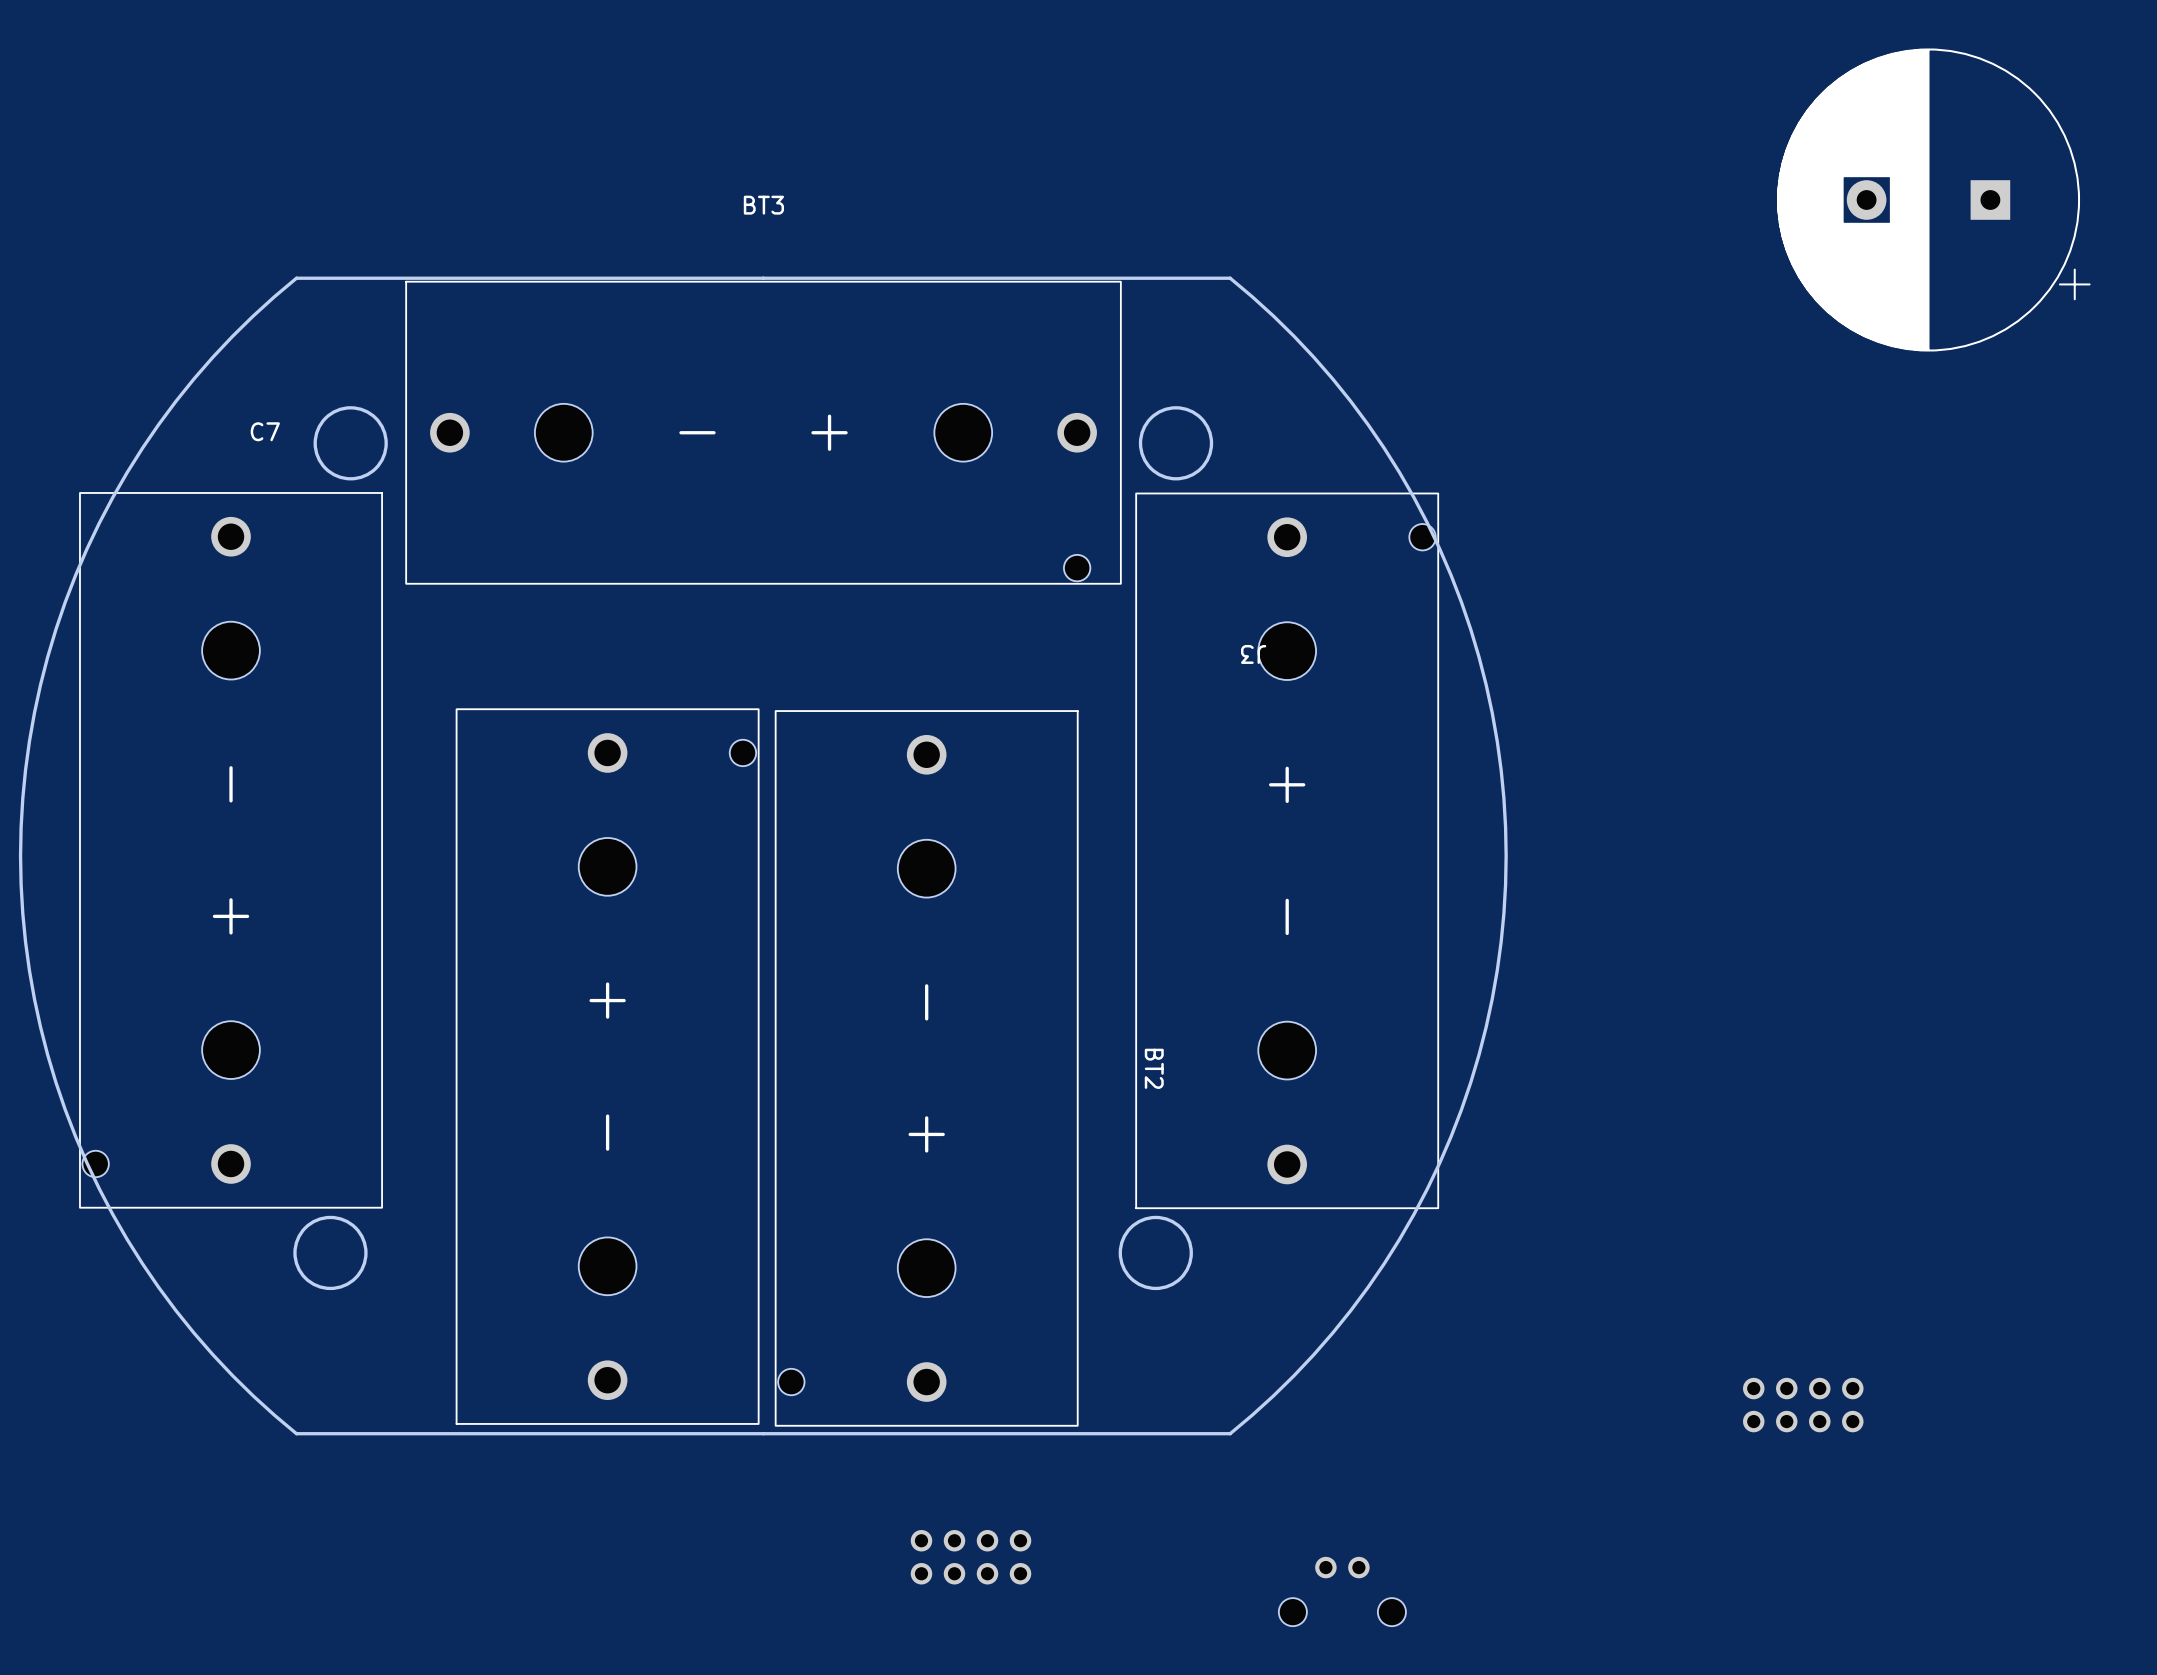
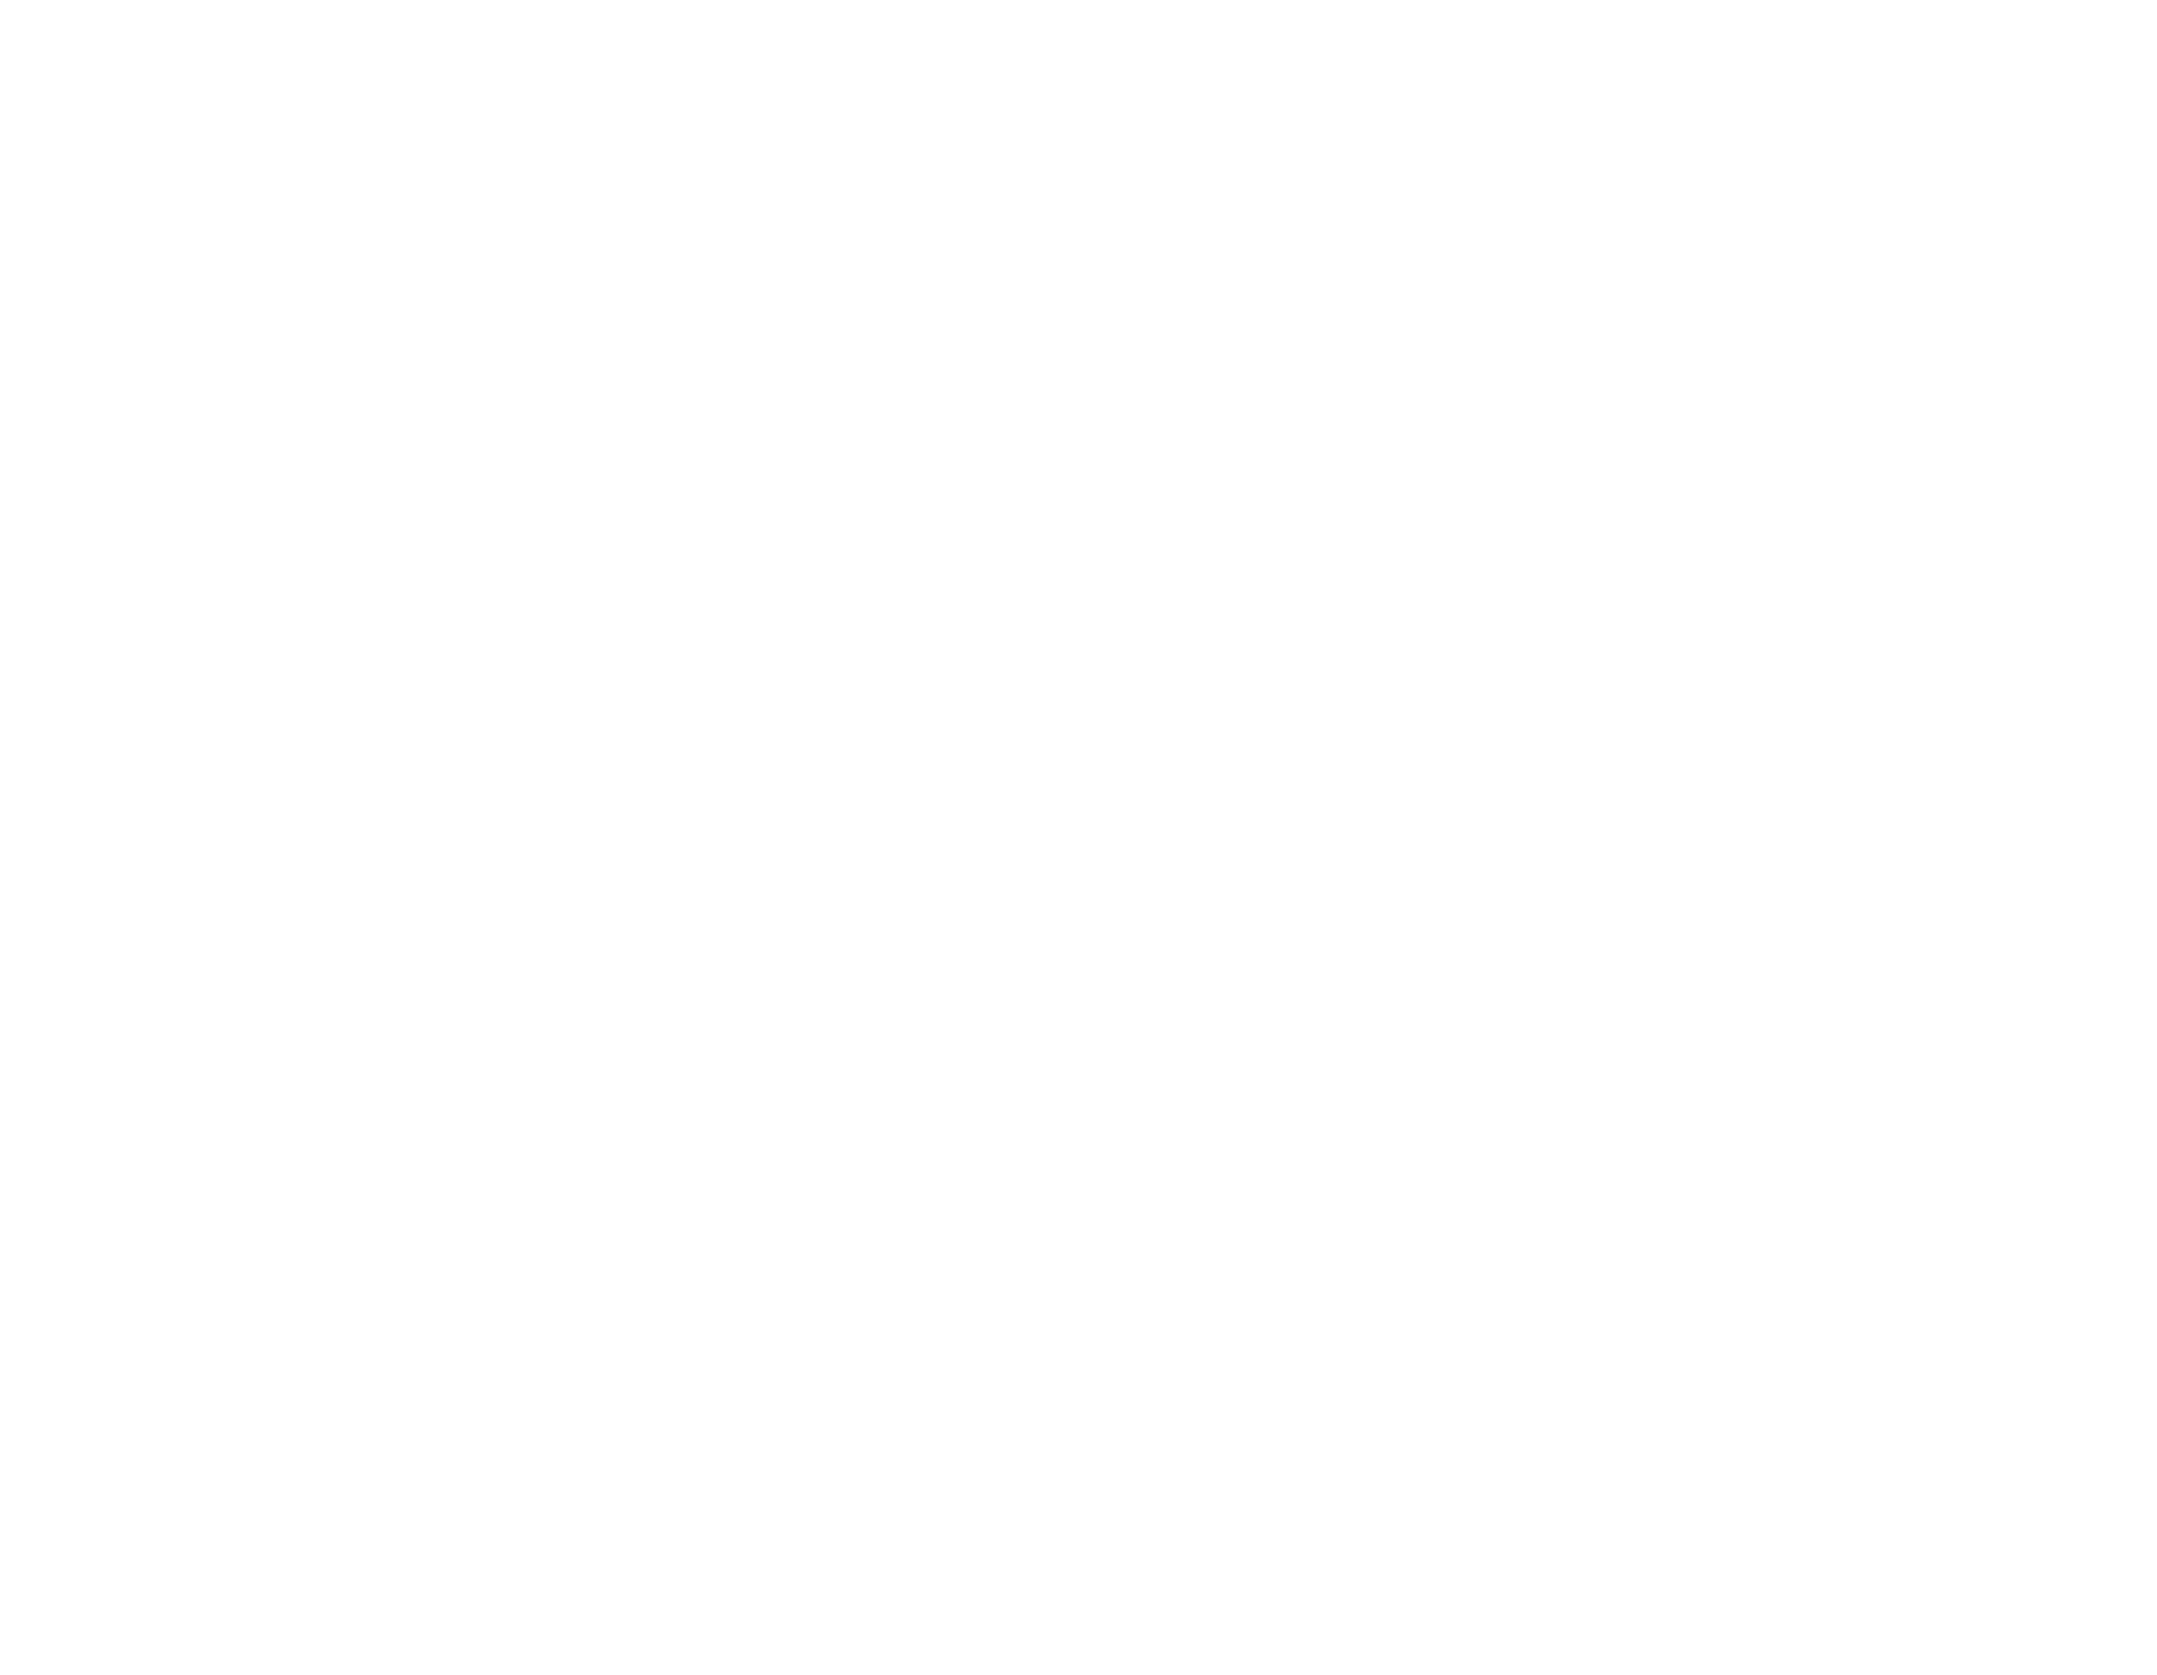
C7: (1933, 199) -> none
board edge: (1230, 278) (296, 278) (232, 336) (193, 378) (142, 448) (112, 497) (75, 575) (55, 629) (40, 684) (25, 769) (20, 855) (22, 913) (34, 998) (55, 1082) (75, 1136) (112, 1214) (142, 1263) (193, 1333) (253, 1395) (296, 1433) (1230, 1433) (1273, 1395) (1332, 1333) (1367, 1287) (1413, 1214) (1439, 1163) (1470, 1082) (1486, 1027) (1501, 942) (1506, 855) (1501, 769) (1486, 684) (1470, 629) (1439, 548) (1413, 497) (1367, 424) (1332, 378) (1294, 336) (1230, 278) -> none
round board edge: [313, 406, 388, 481] -> none
round board edge: [1138, 406, 1214, 481] -> none
BT3: (763, 432) -> none
part: (231, 850) -> none
part: (1287, 850) -> none
part: (607, 1066) -> none
BT2: (926, 1068) -> none
round board edge: [293, 1215, 368, 1291] -> none
round board edge: [1118, 1215, 1193, 1291] -> none
part: (1803, 1405) -> none
J3: (971, 1557) -> none
part: (1342, 1591) -> none

